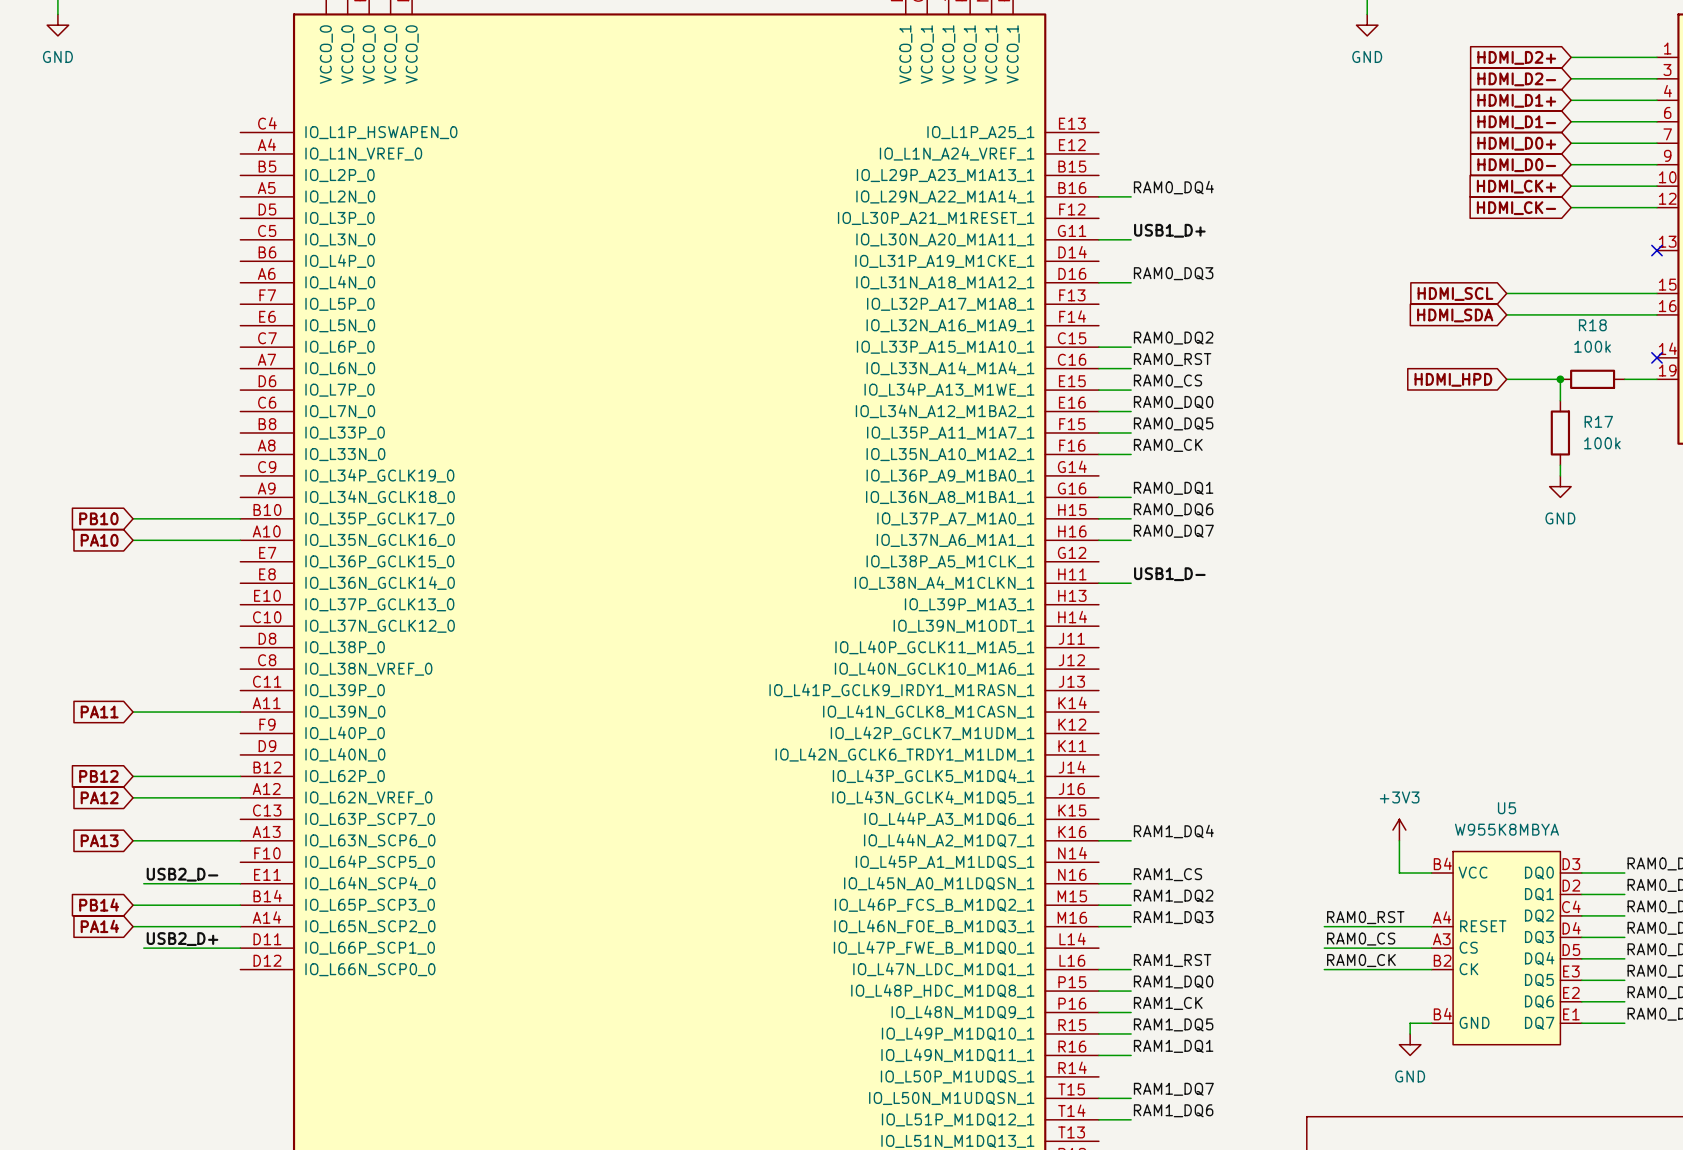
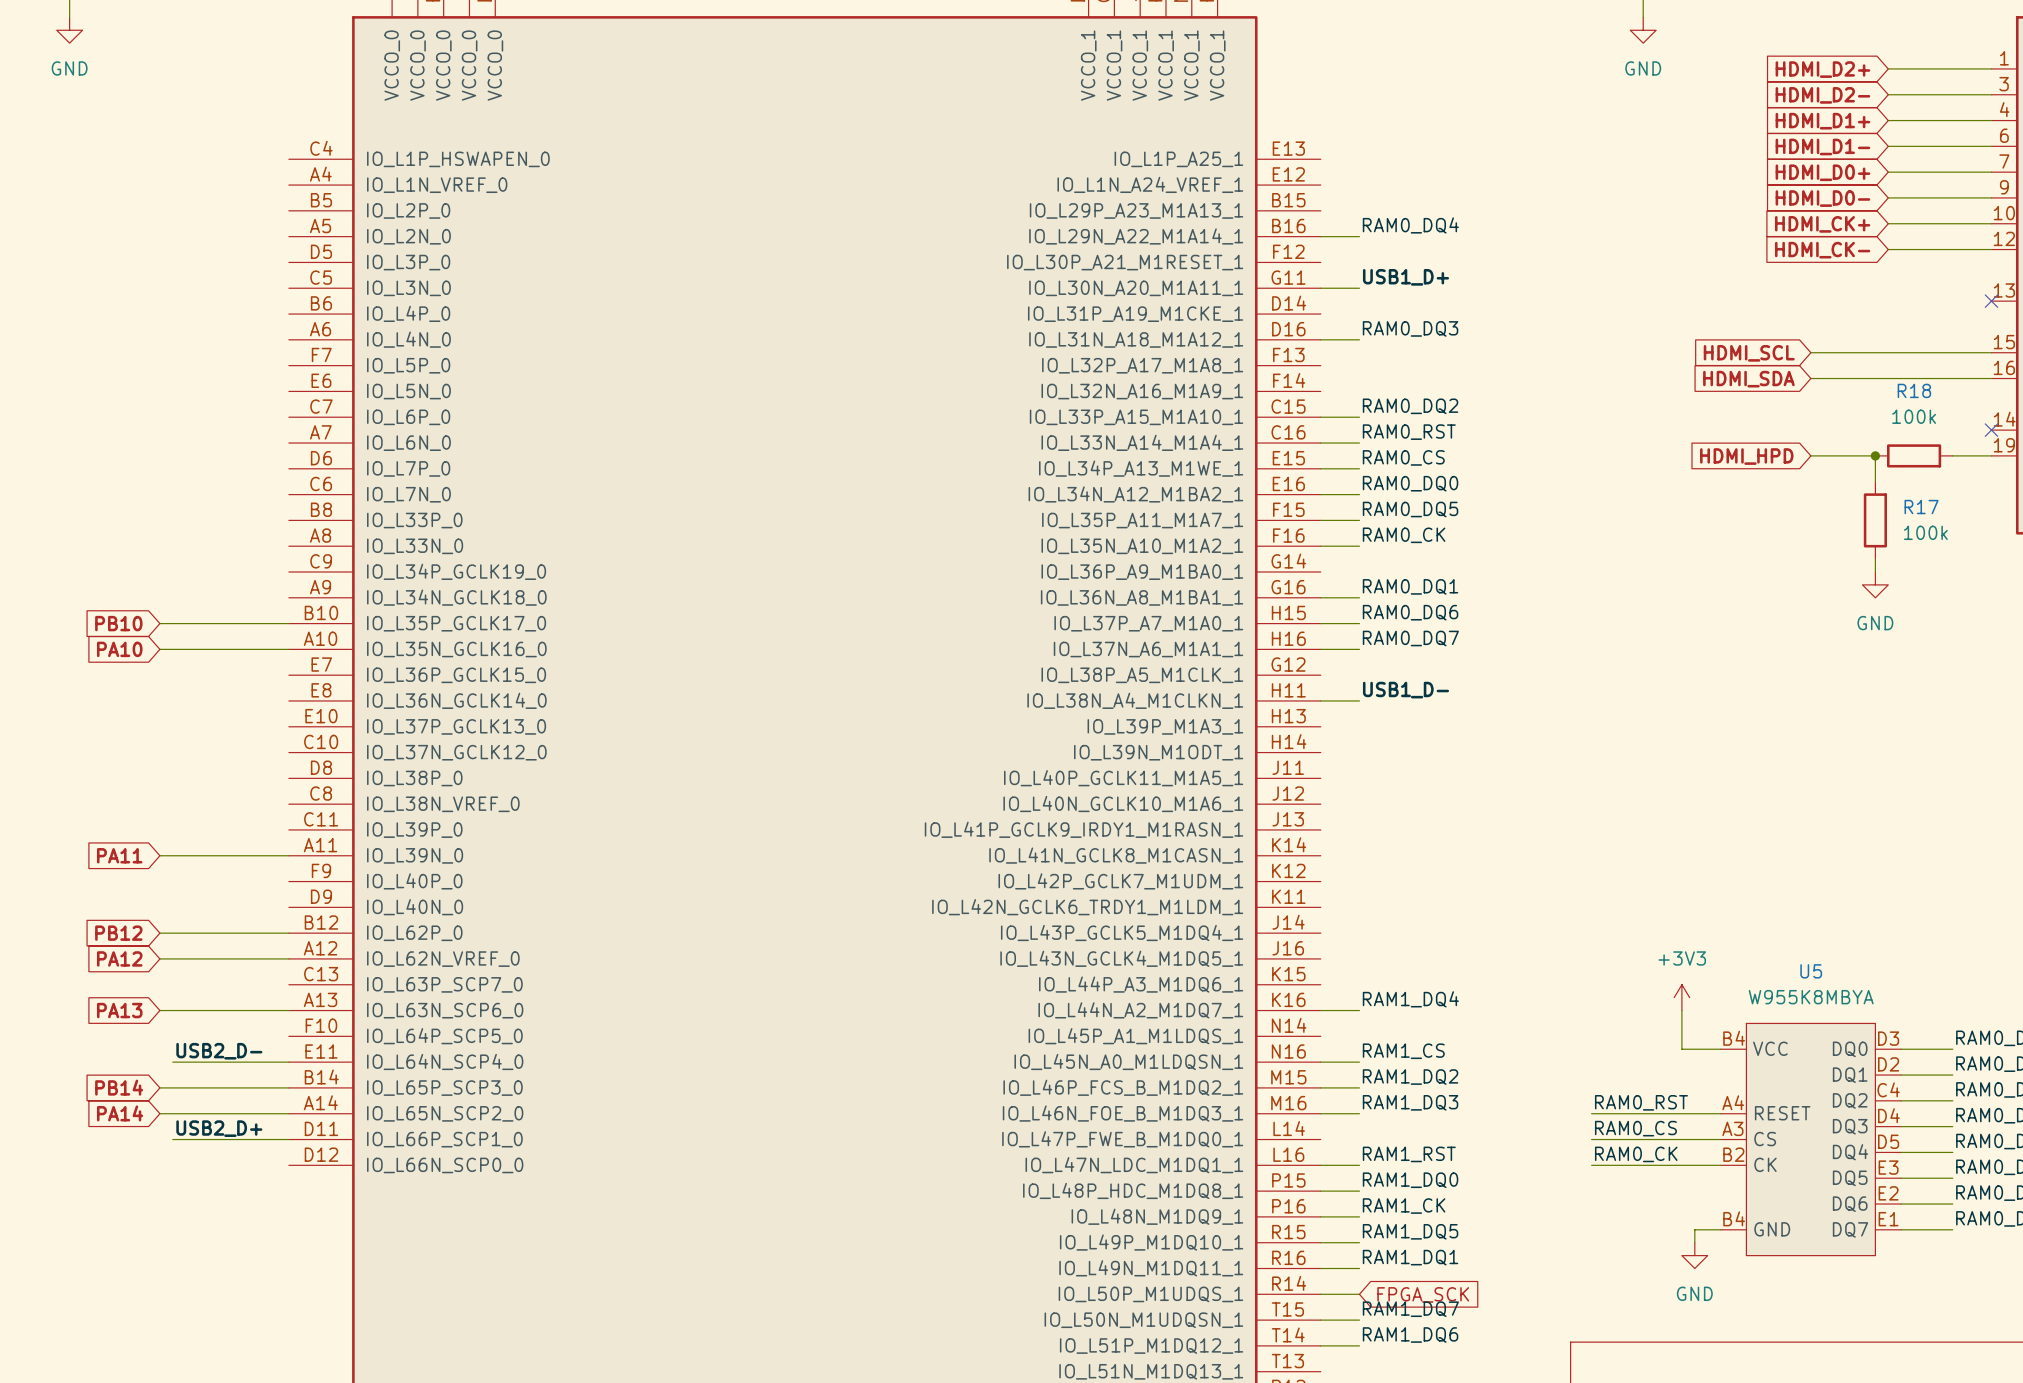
wire: none -> (1320, 1294) (1359, 1294)
global label: none -> FPGA_SCK (1423, 1294)

